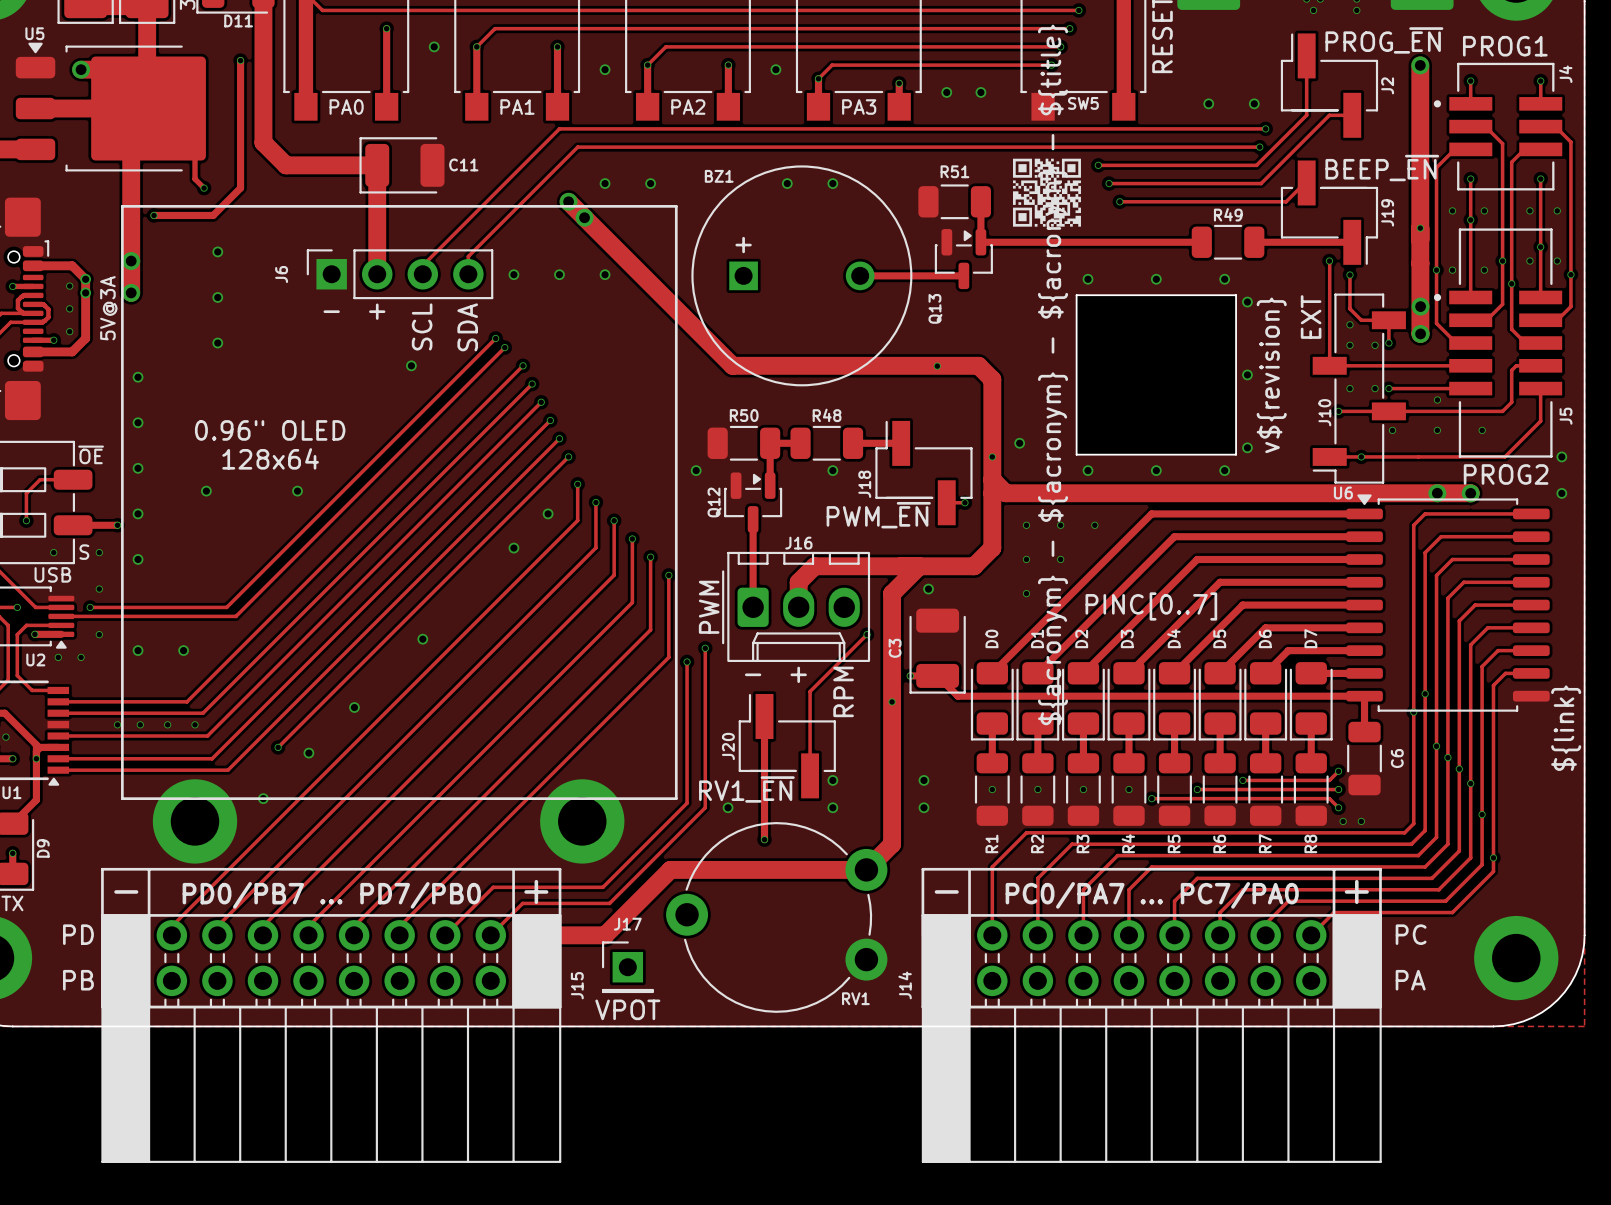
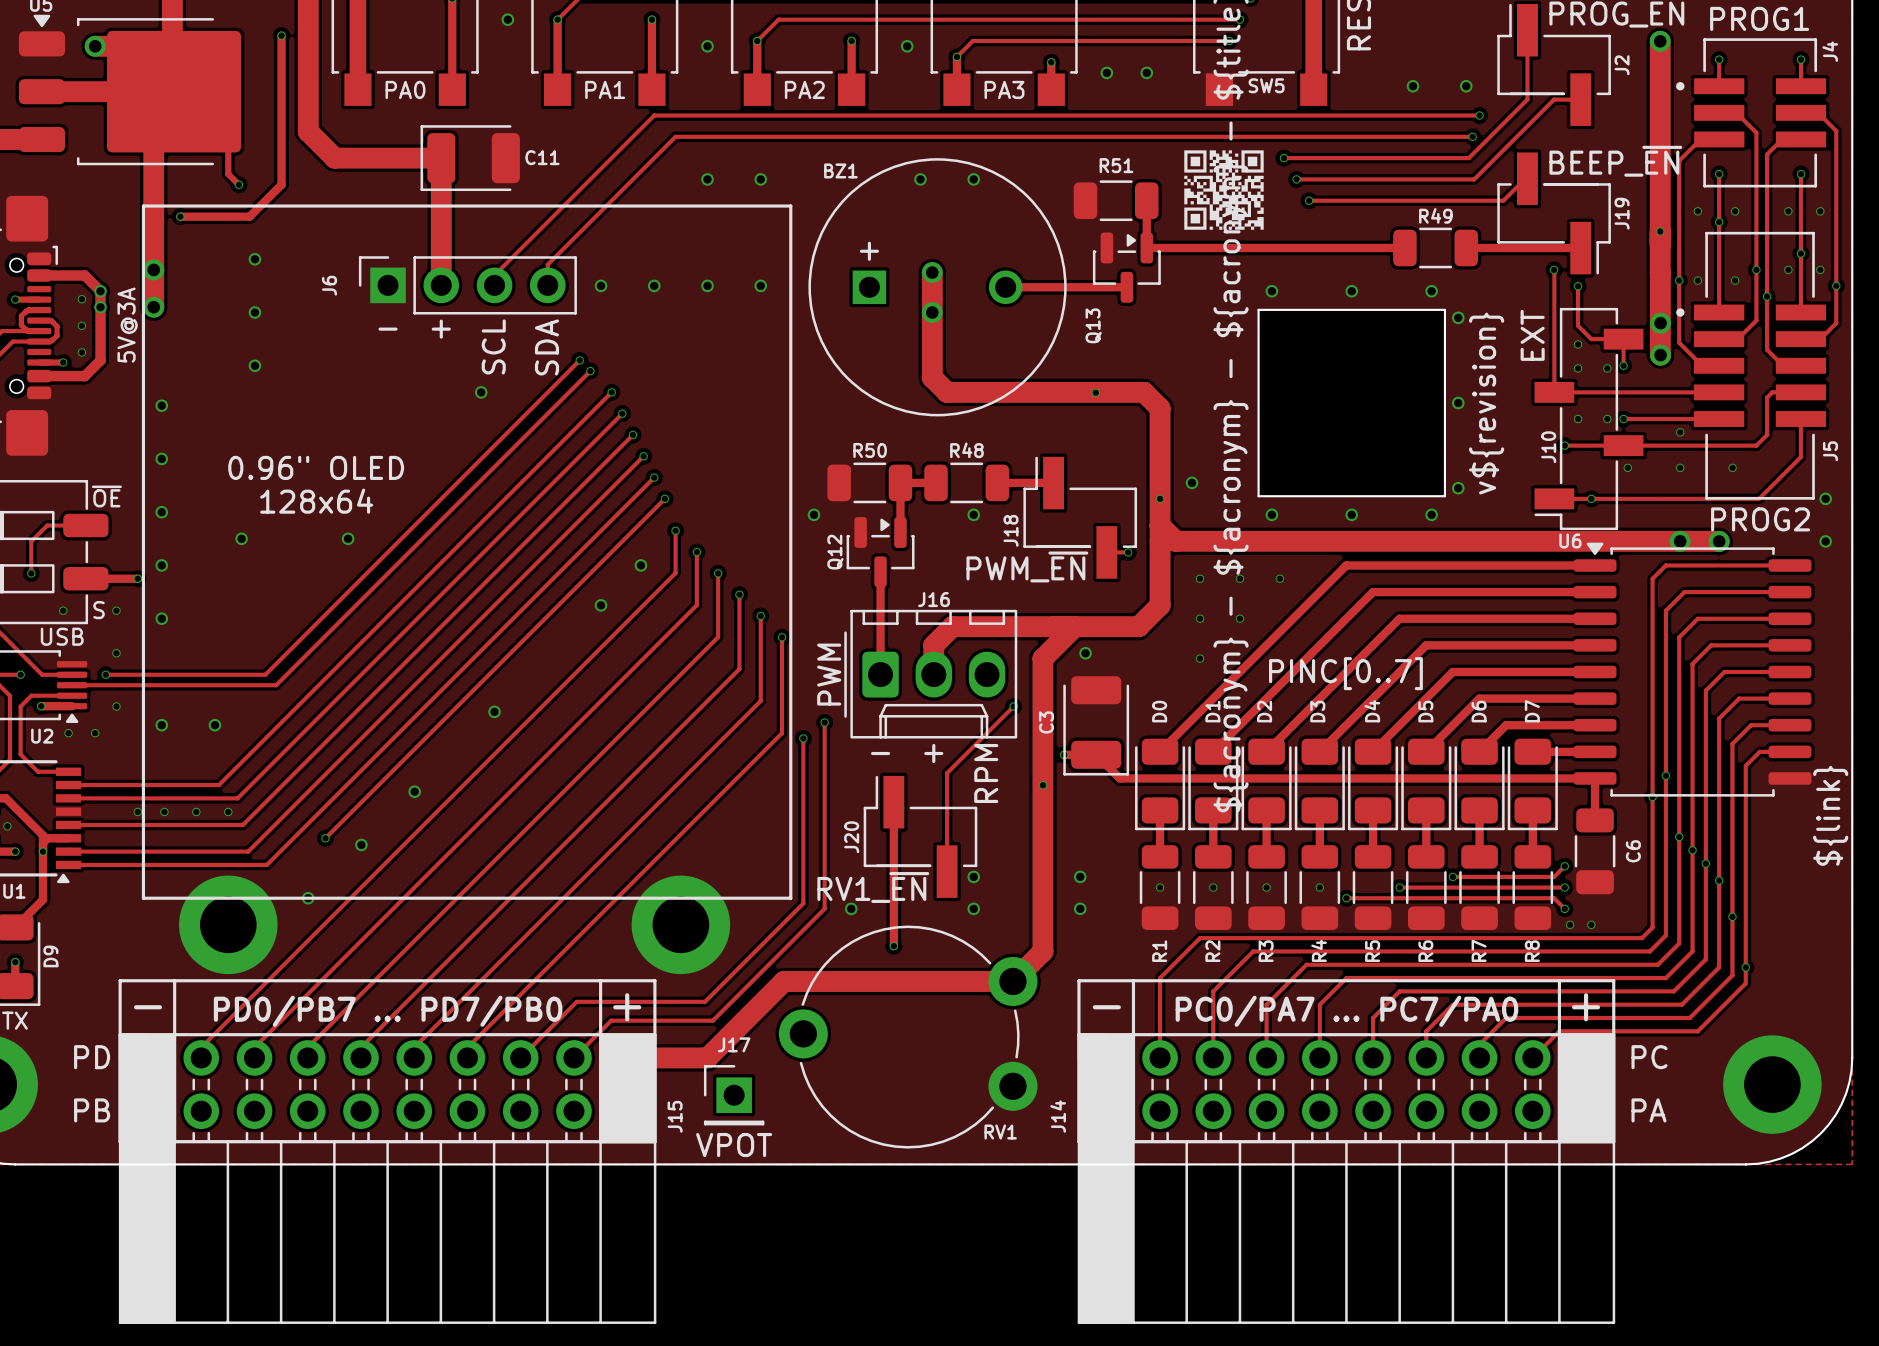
track: (568, 201) (732, 365) (810, 365) -> (932, 272) (932, 377) (947, 392)
via: (568, 201) -> none
via: (584, 217) -> none
via: none -> (932, 272)
via: none -> (760, 285)
via: none -> (932, 312)

